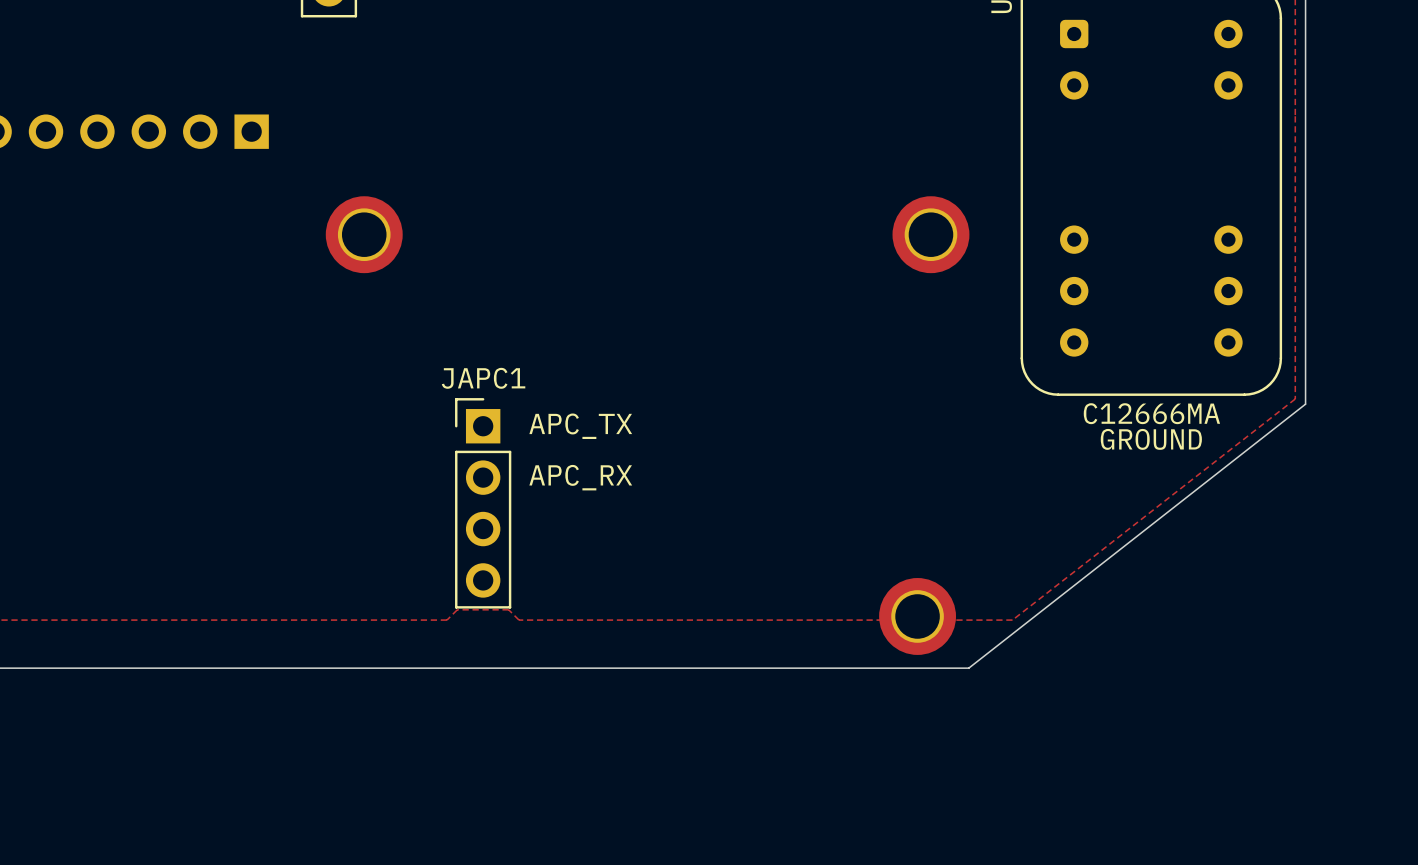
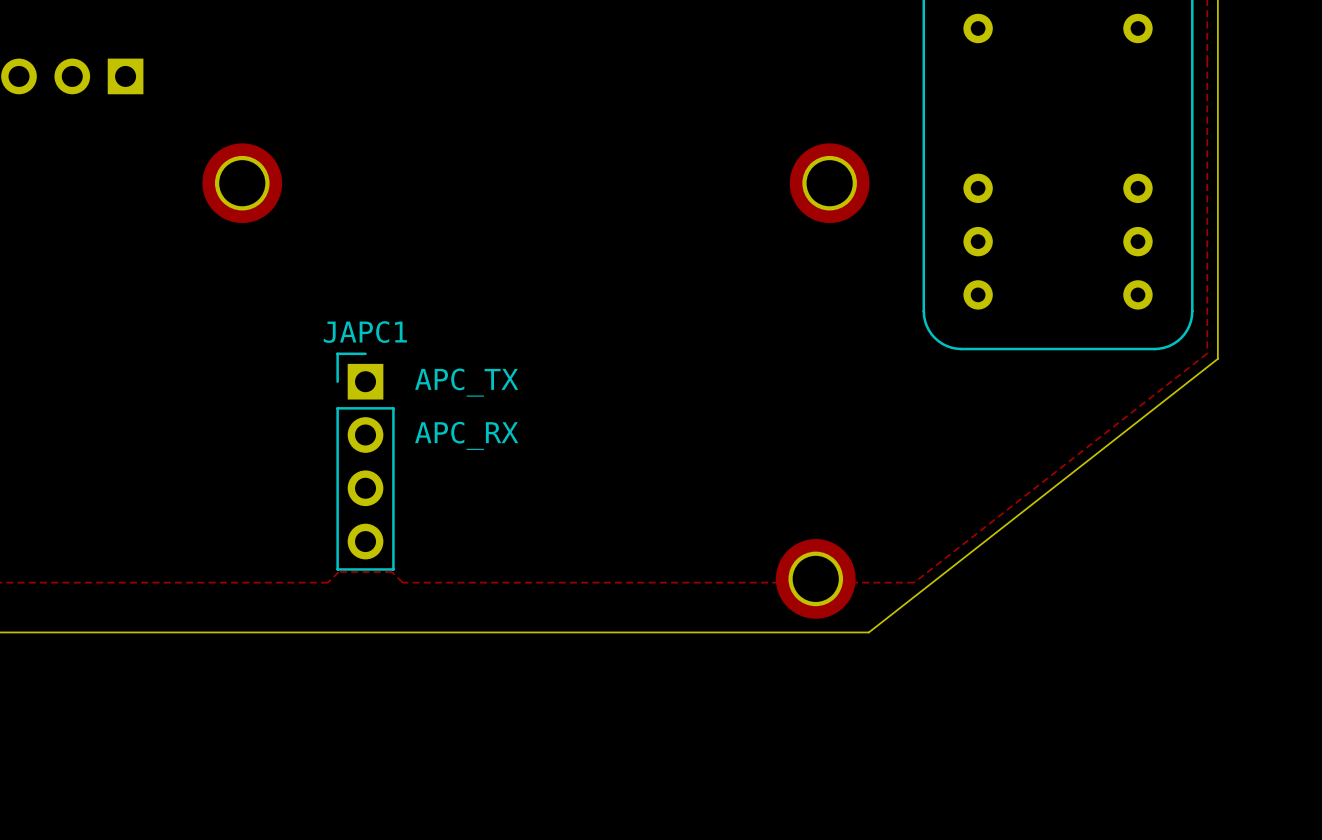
text: C12666MA (1151, 413) -> none
text: GROUND (1151, 439) -> none

